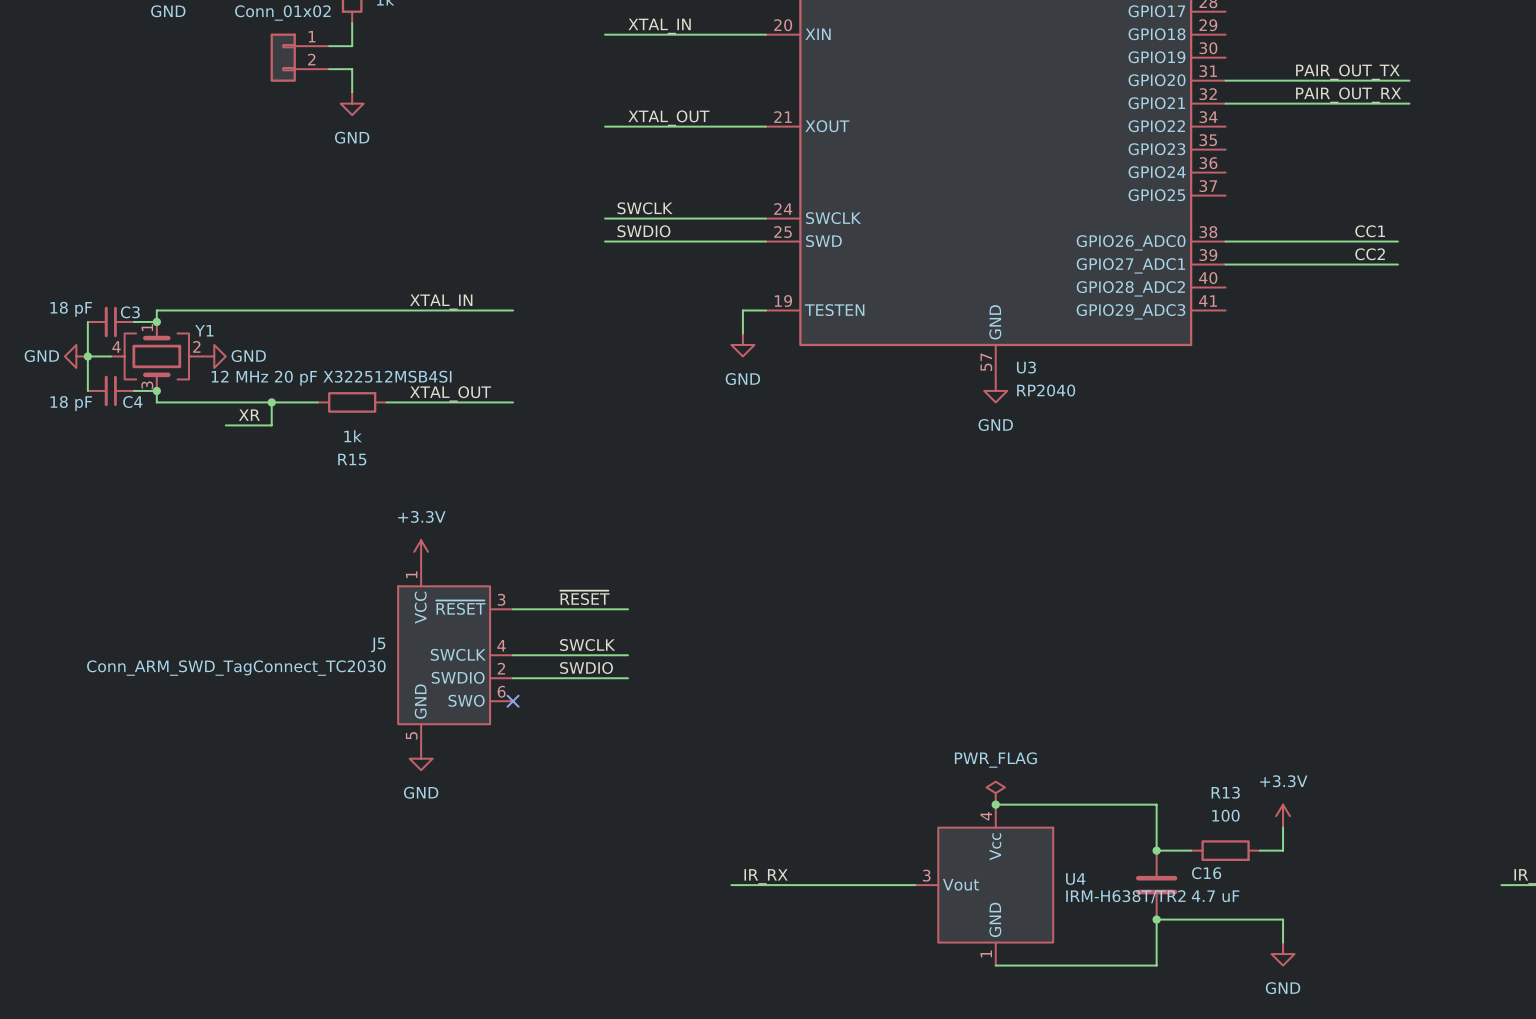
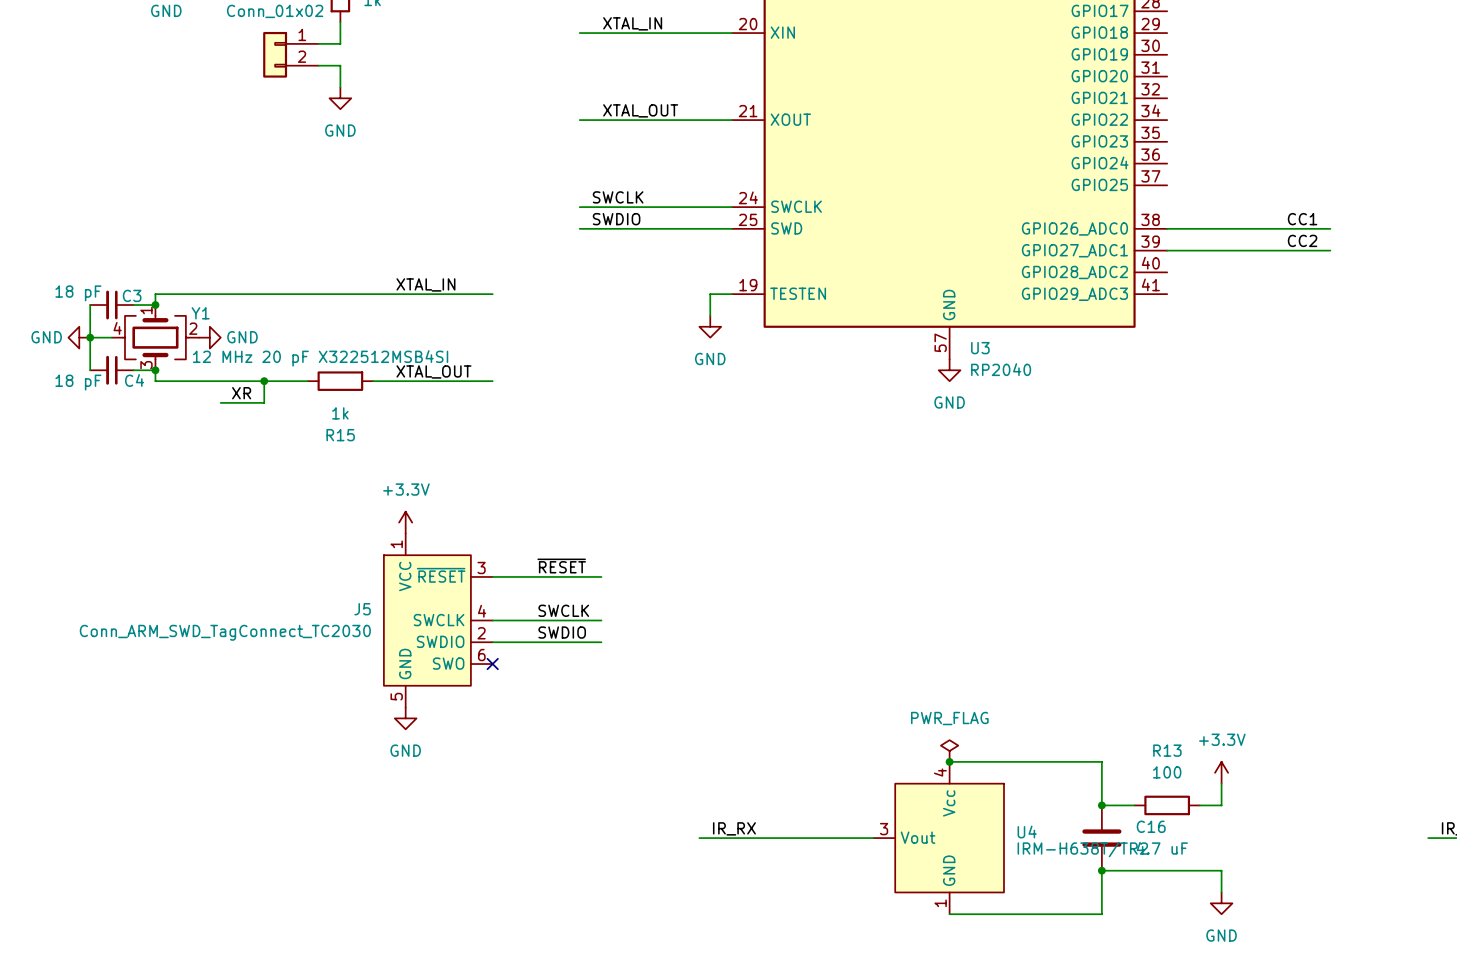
label: PAIR_OUT_TX (1347, 72) -> none
wire: (1225, 80) (1409, 80) -> none
label: PAIR_OUT_RX (1348, 95) -> none
wire: (1225, 103) (1409, 103) -> none

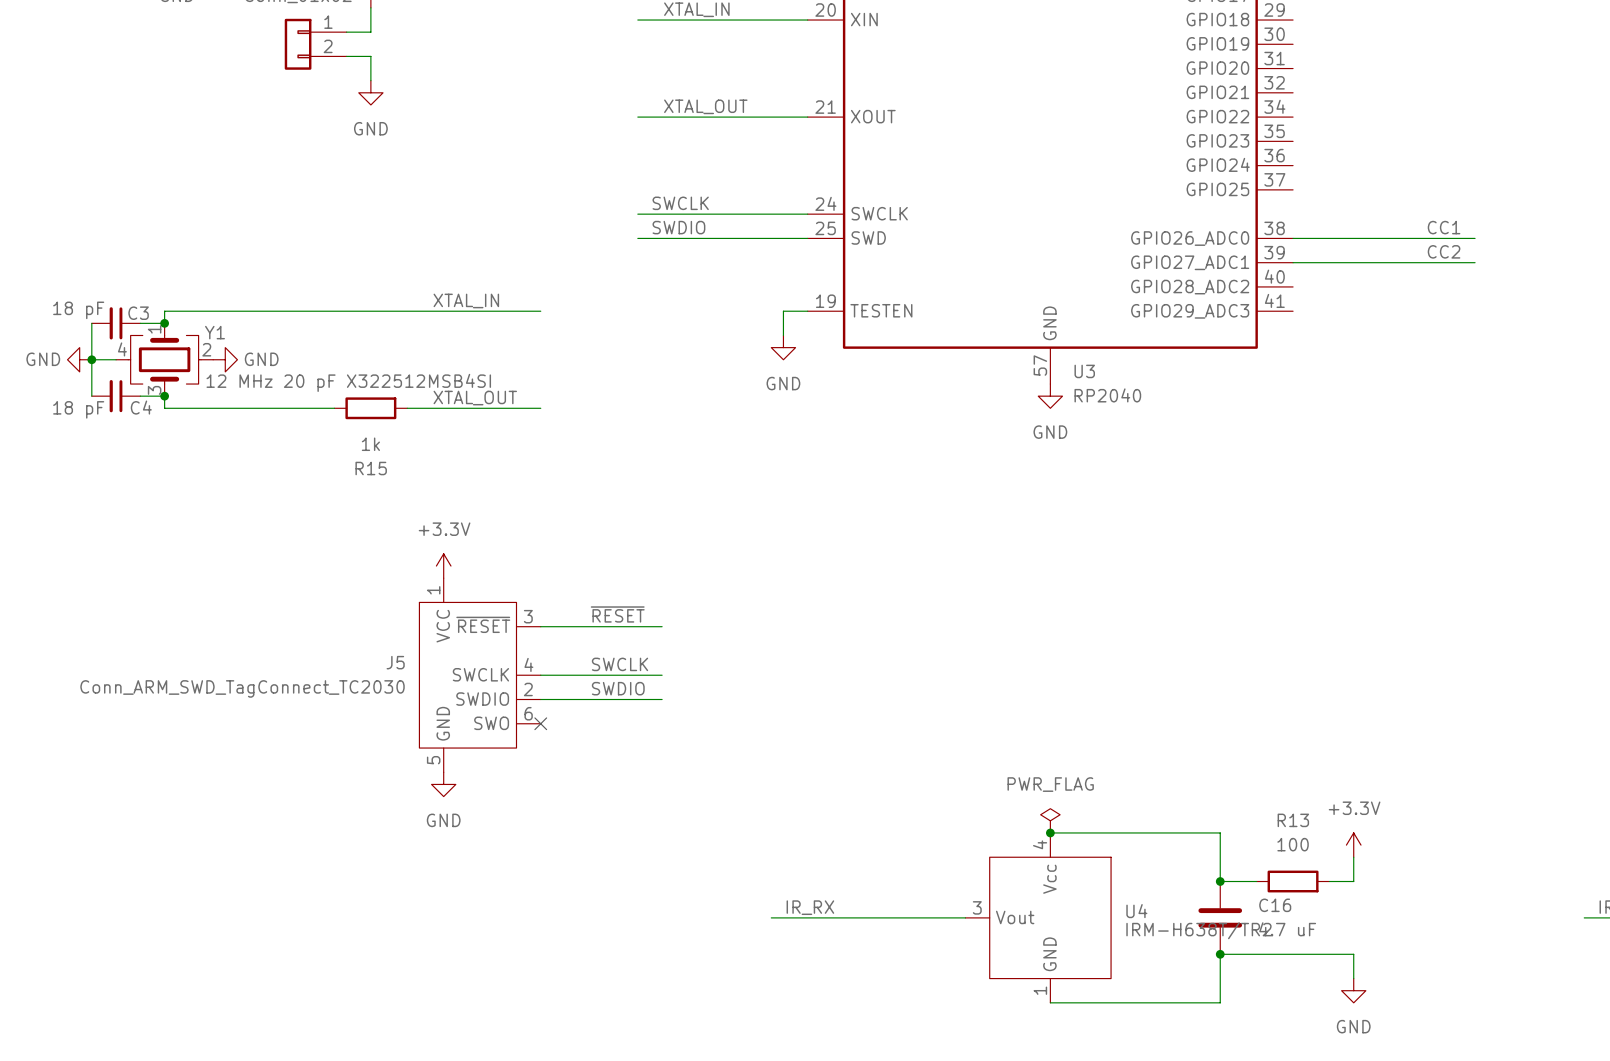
wire: (264, 381) (264, 402) (220, 402) -> none
junction: (264, 381) -> none
label: XR (241, 393) -> none

